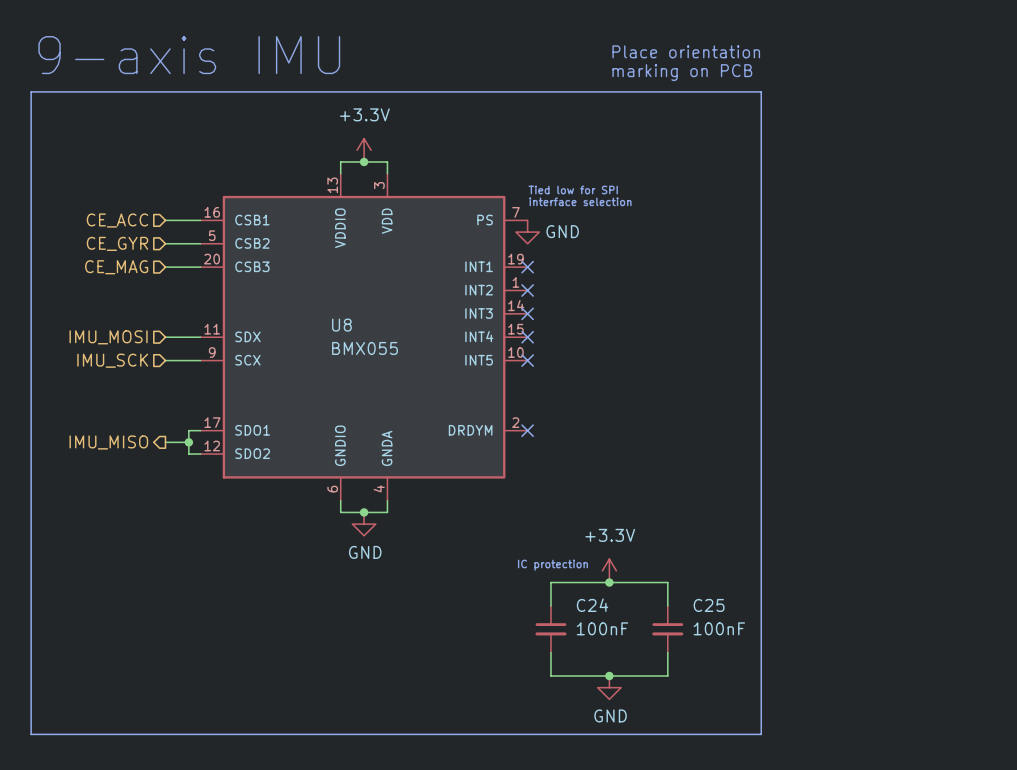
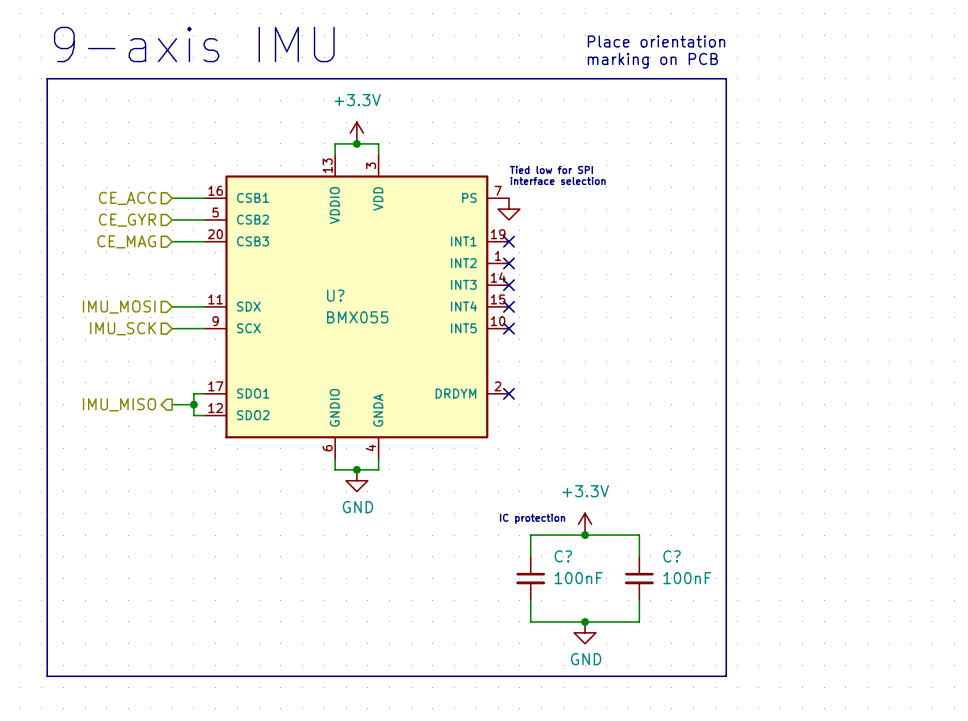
power symbol text: GND (562, 231) -> none
U8 name: U8 (341, 325) -> U? (335, 295)
C24 name: C24 (592, 605) -> C? (563, 556)
C25 name: C25 (709, 605) -> C? (672, 556)

